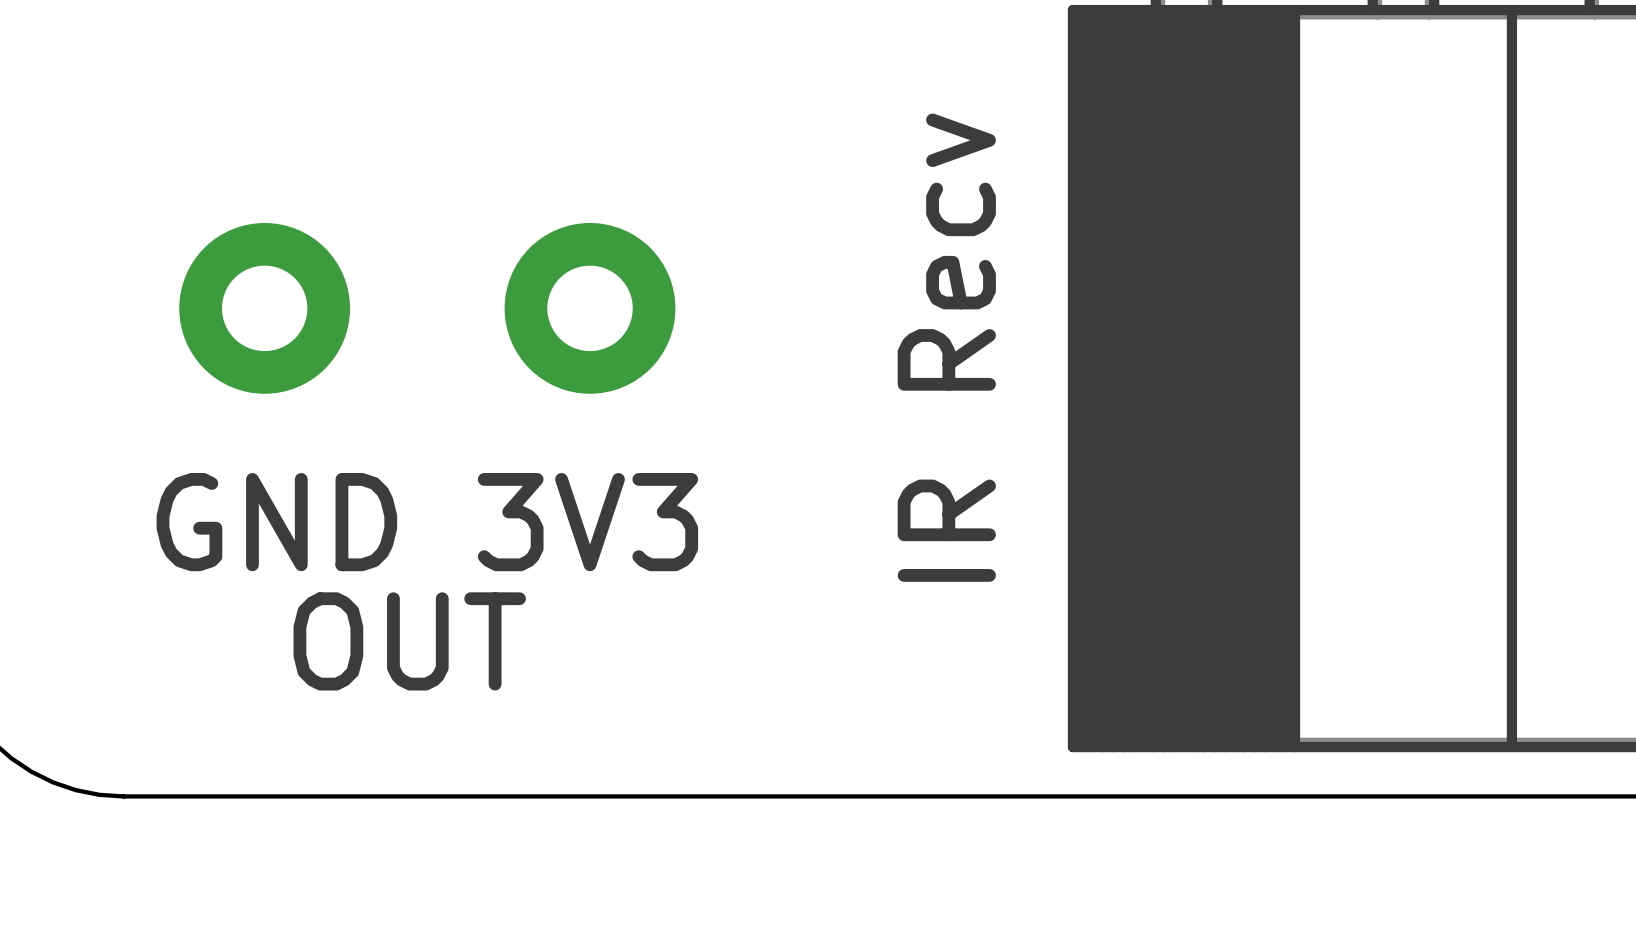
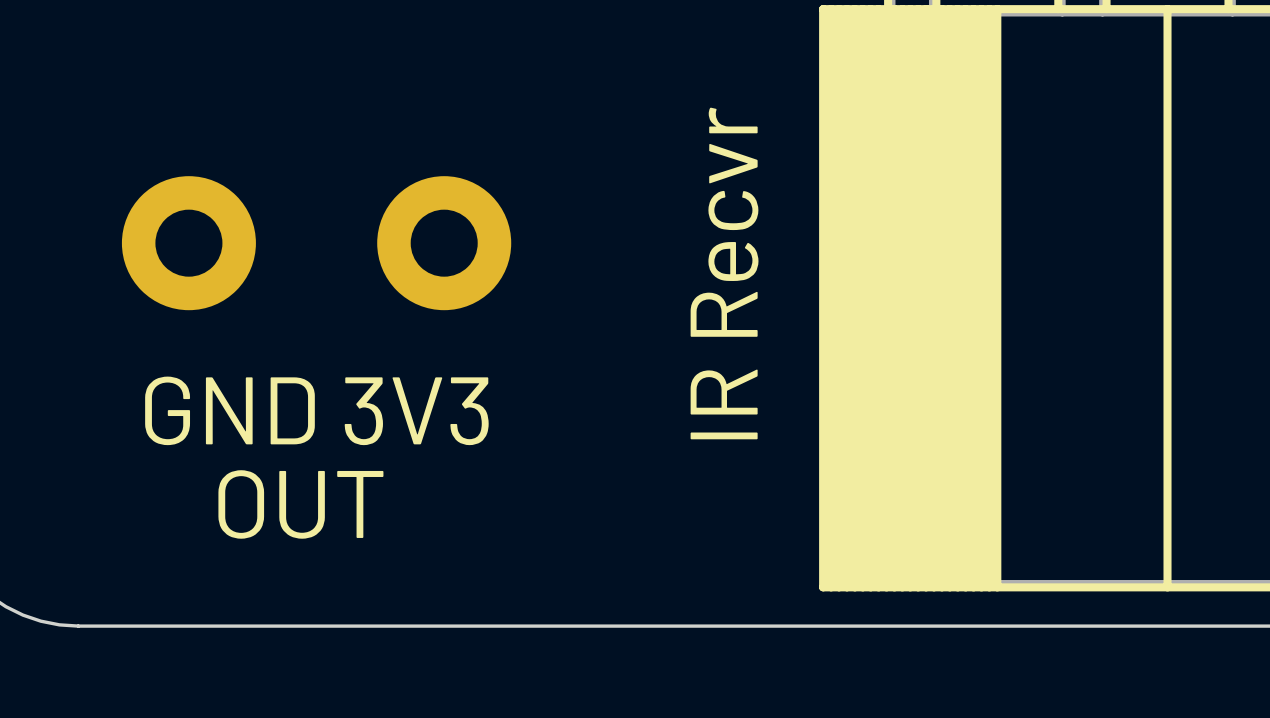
IR Recv name: IR Recv (946, 347) -> IR Recvr (724, 273)

